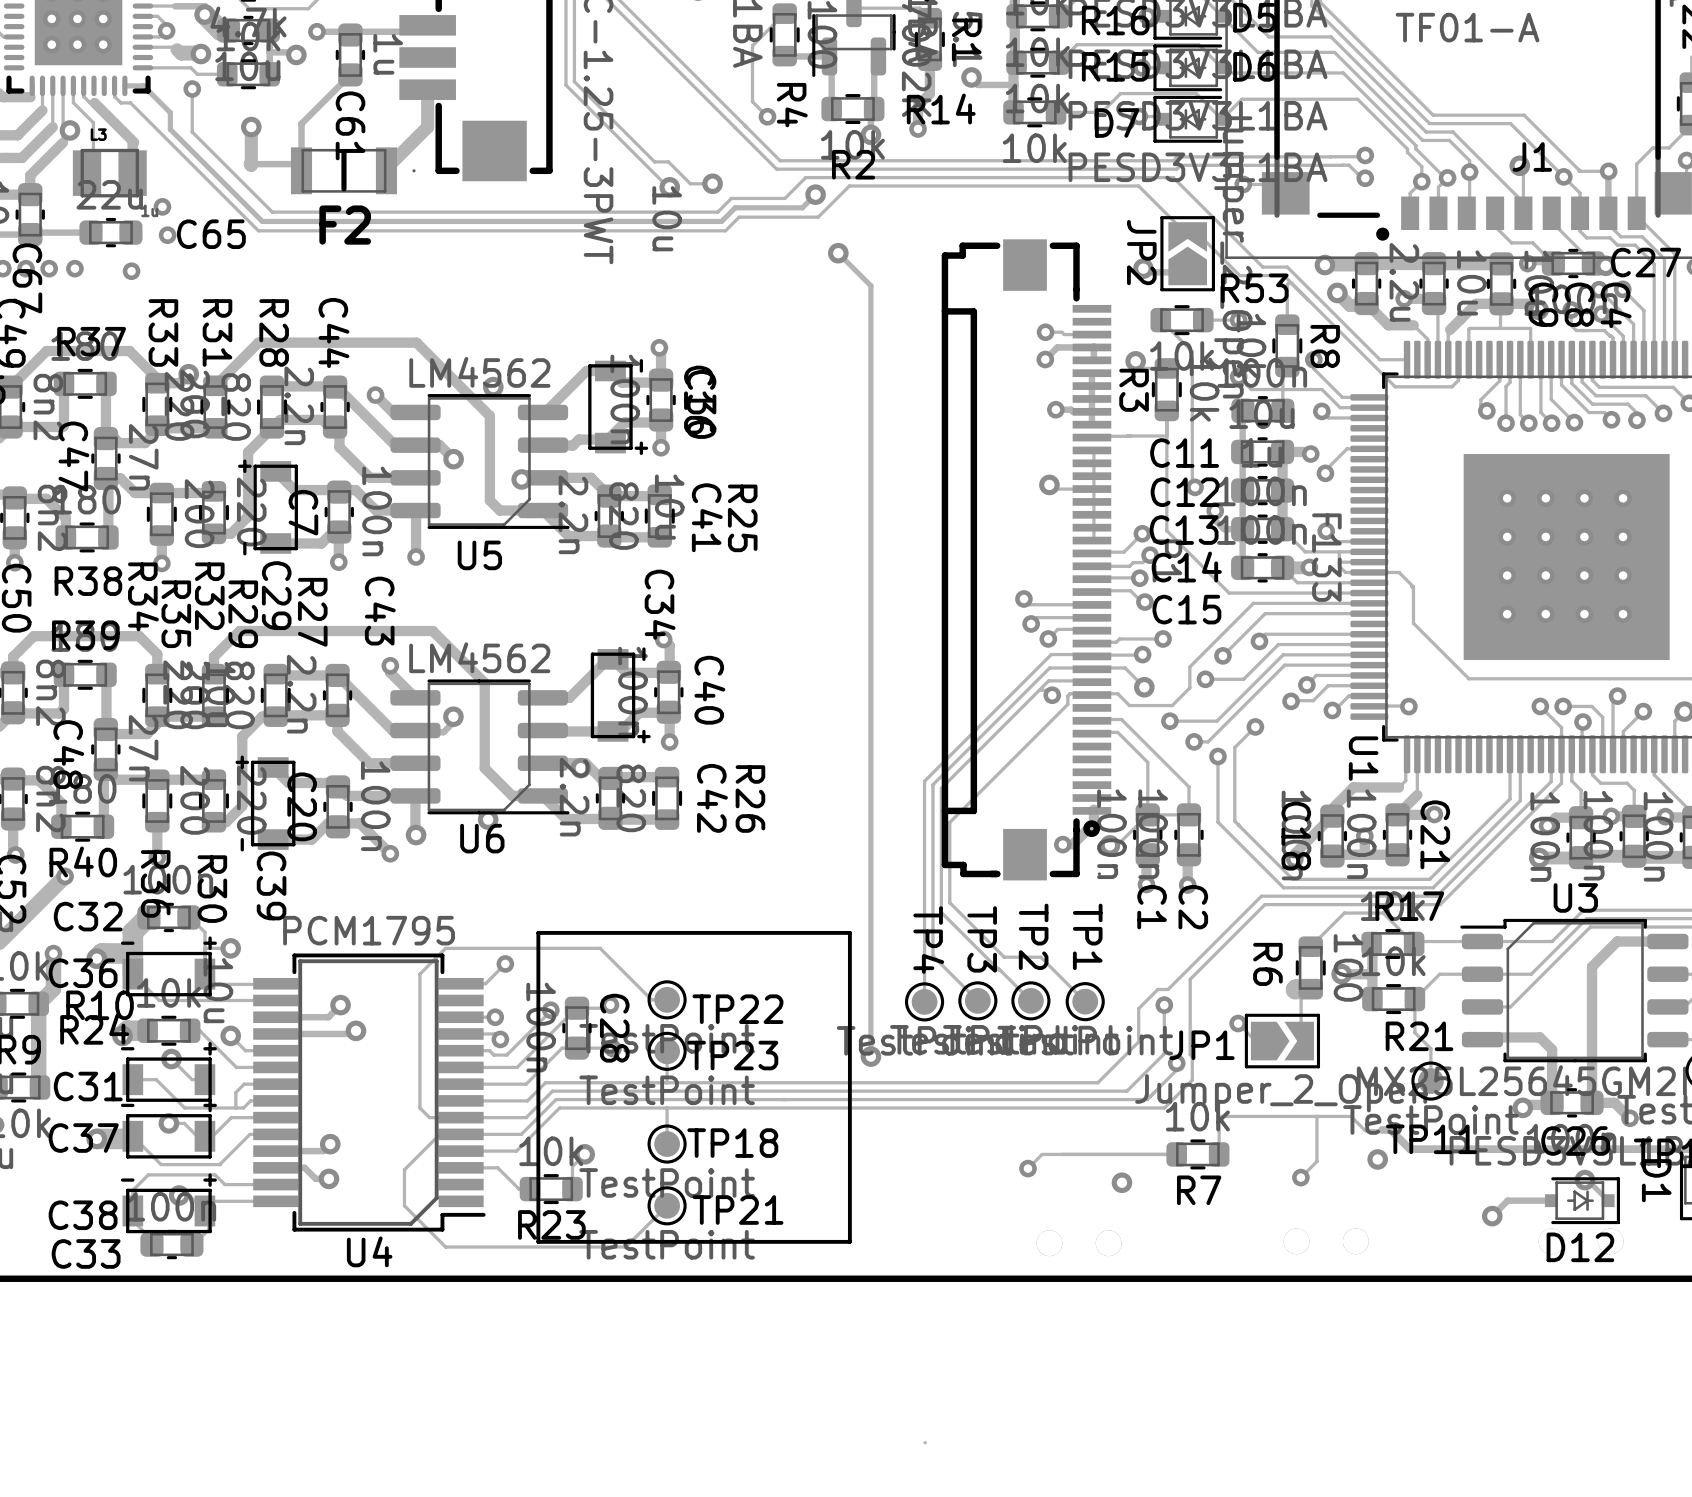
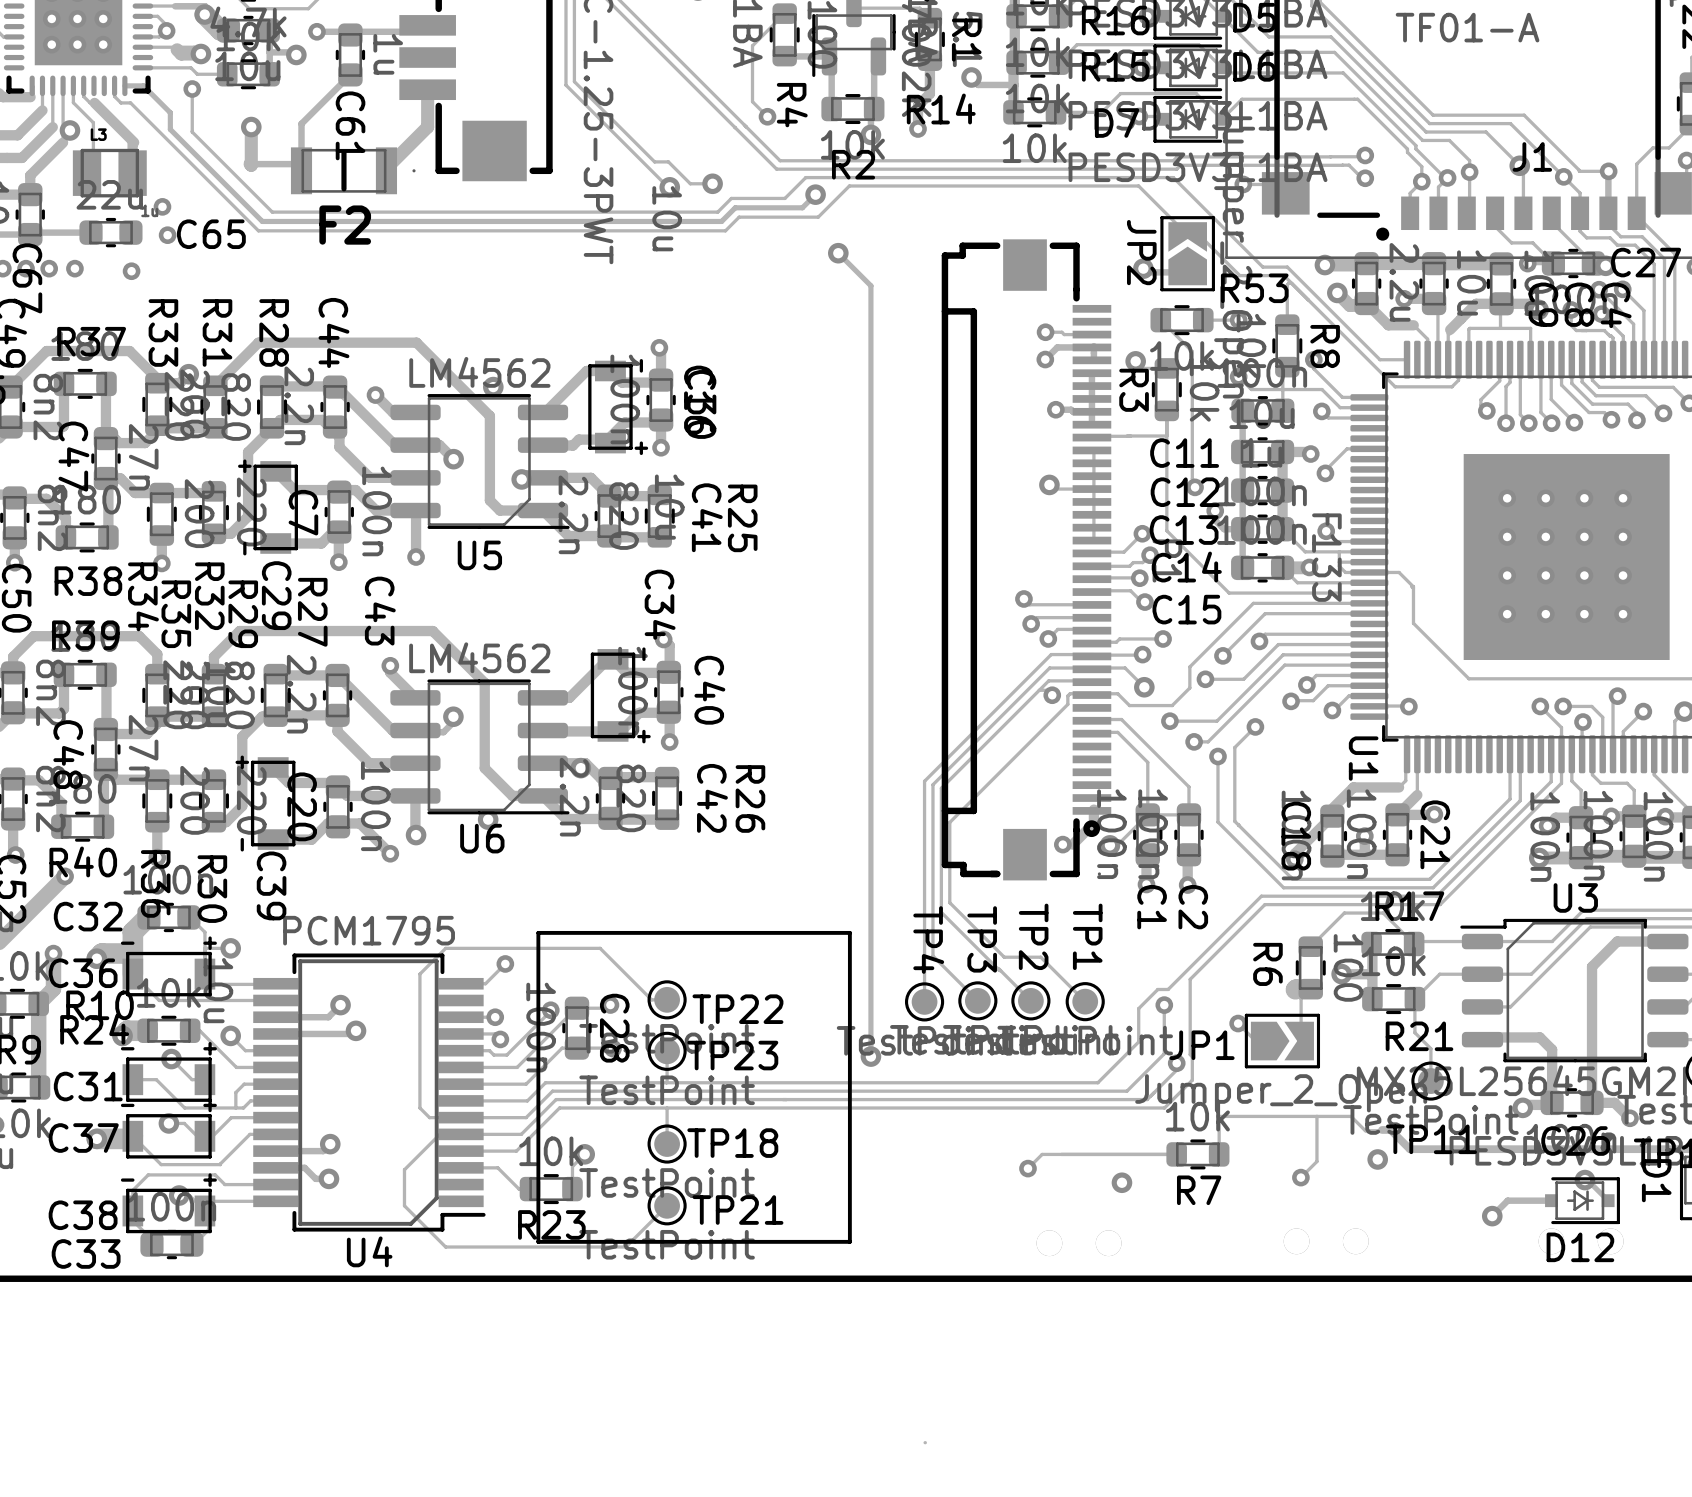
track: (1452, 132) (1523, 202) -> (1452, 132) (1486, 132) (1519, 165)

